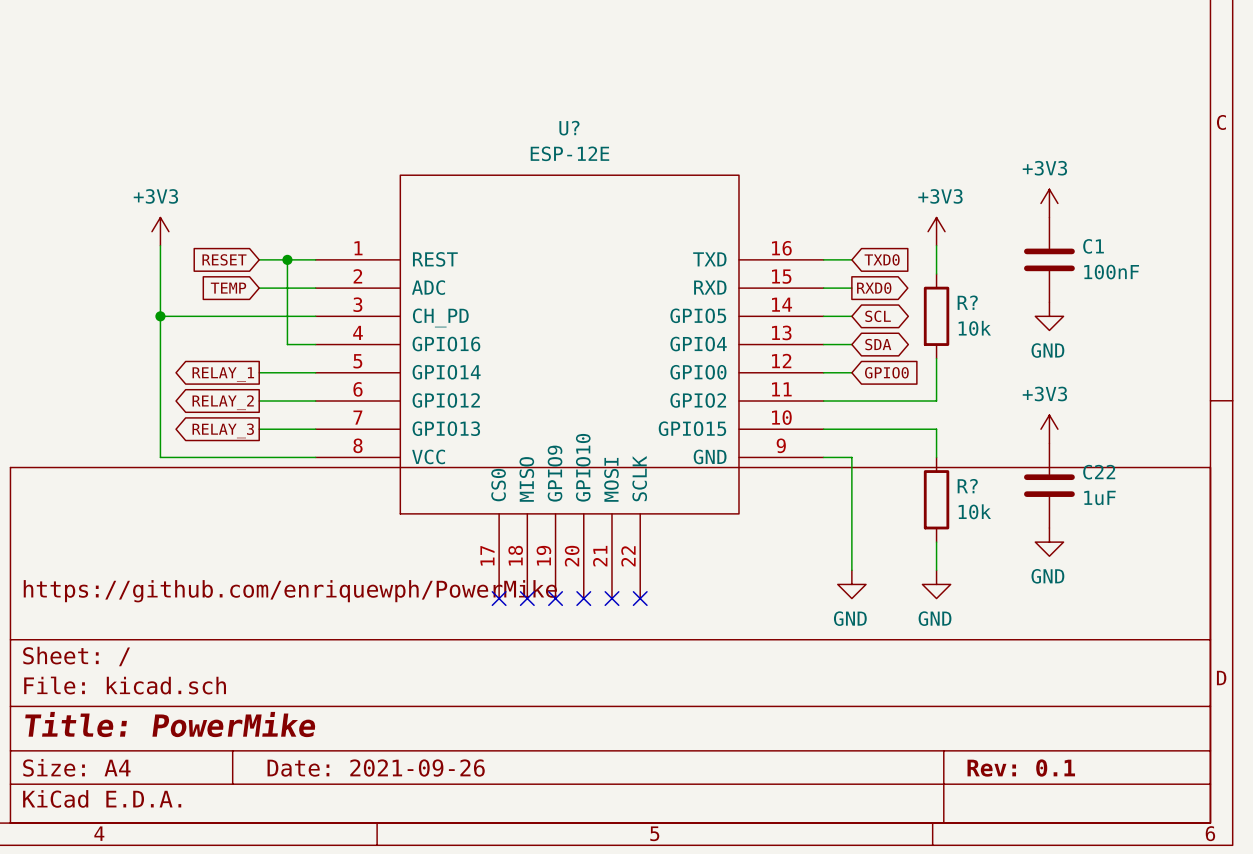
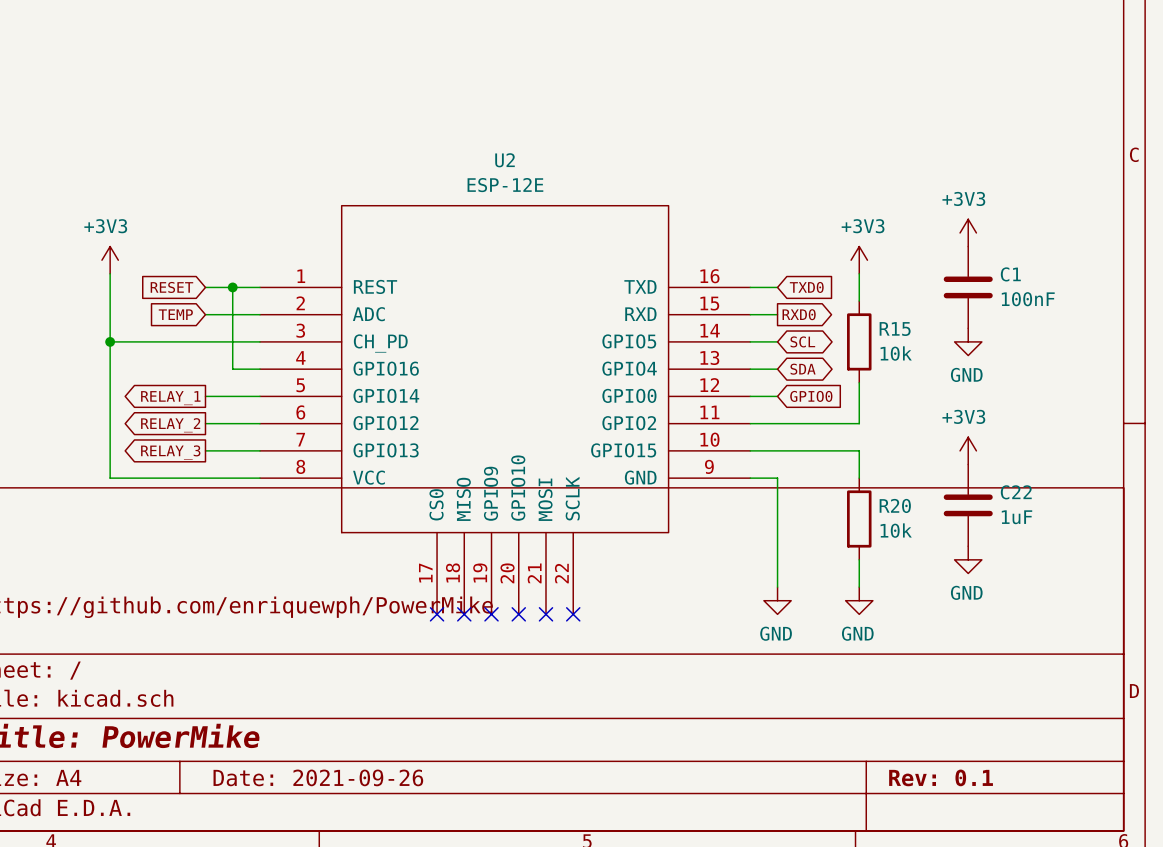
U? name: U? (569, 128) -> U2 (505, 160)
R? name: R? (967, 302) -> R15 (895, 329)
R? name: R? (967, 486) -> R20 (895, 505)

